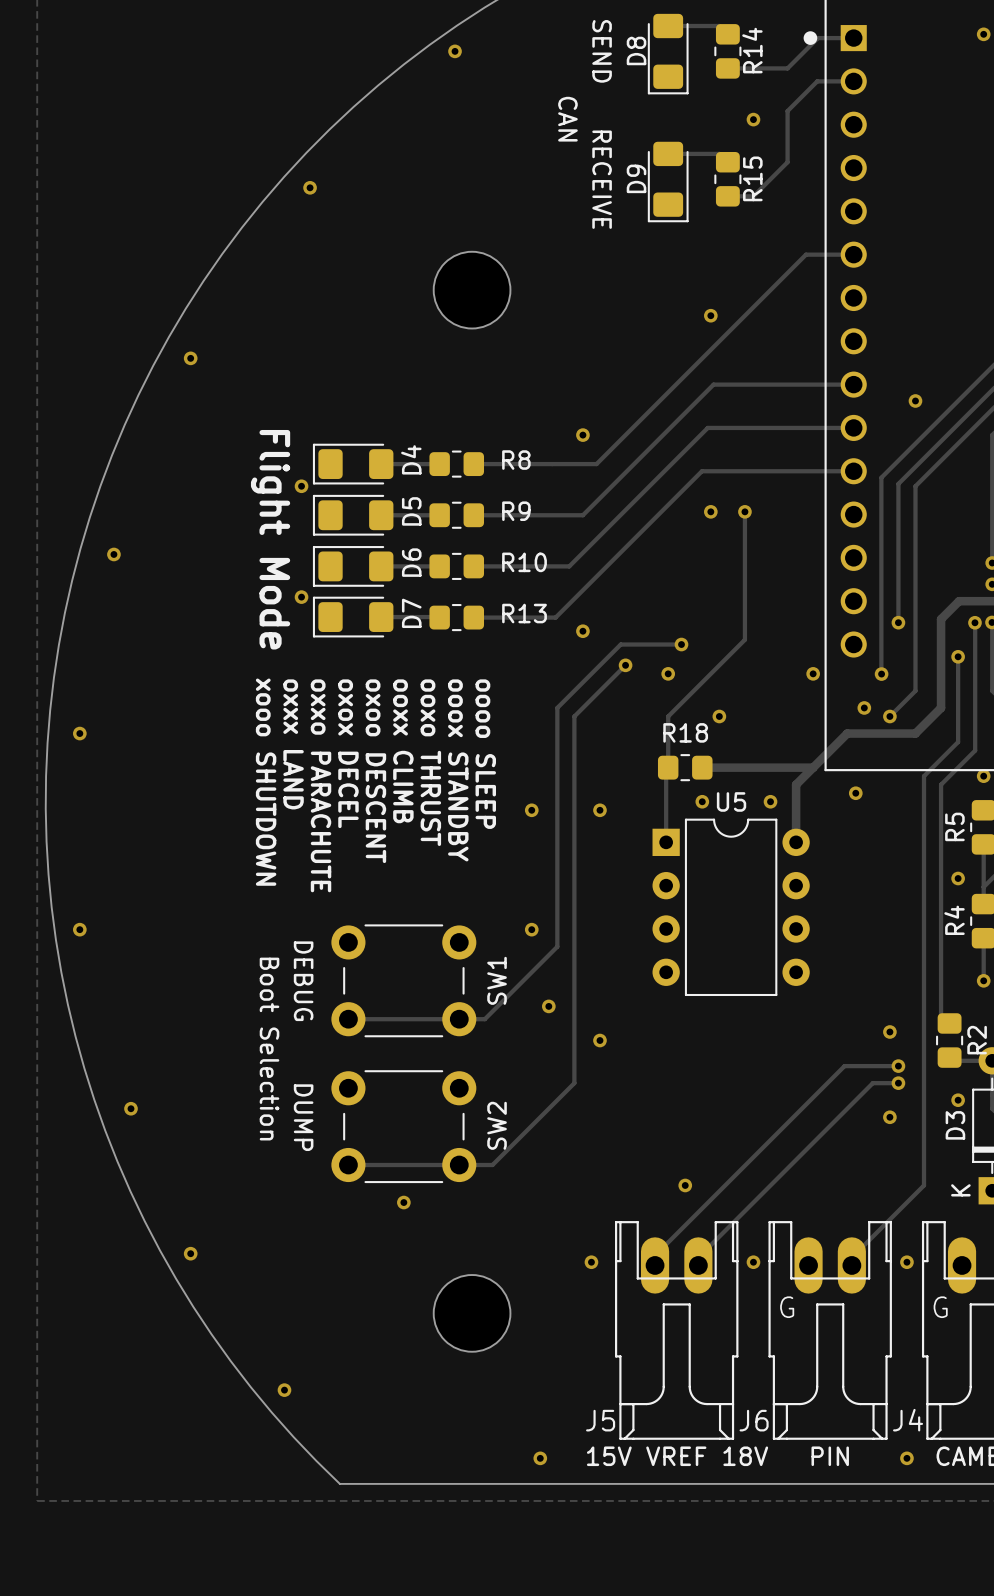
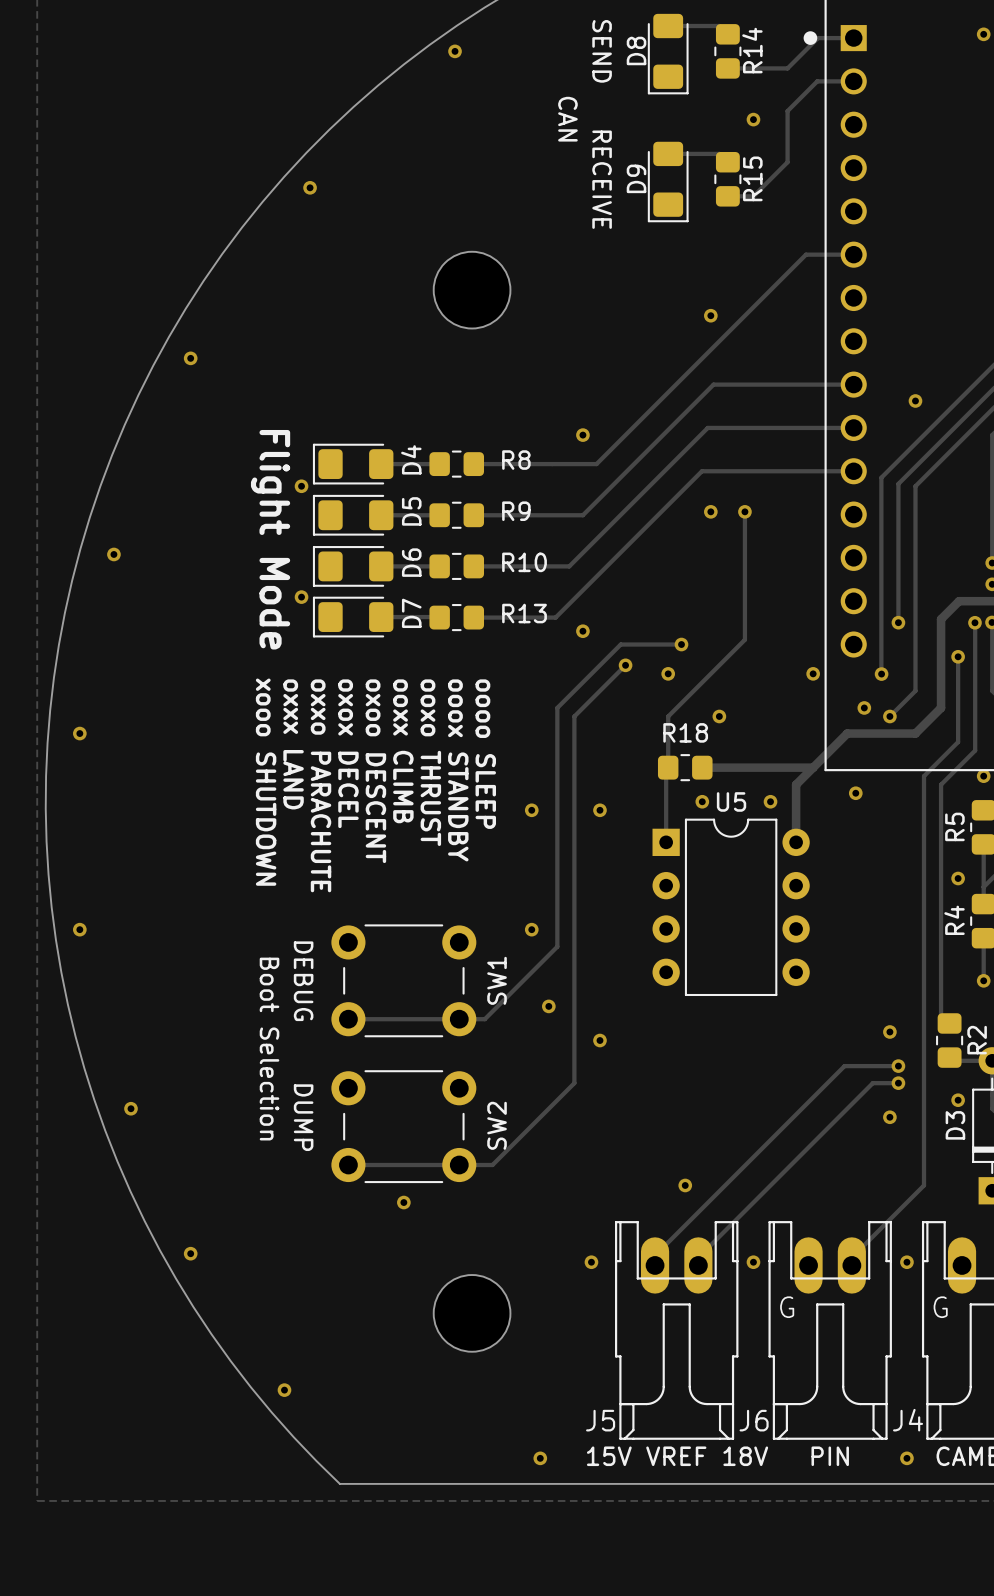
D3 text: K (960, 1190) -> none

